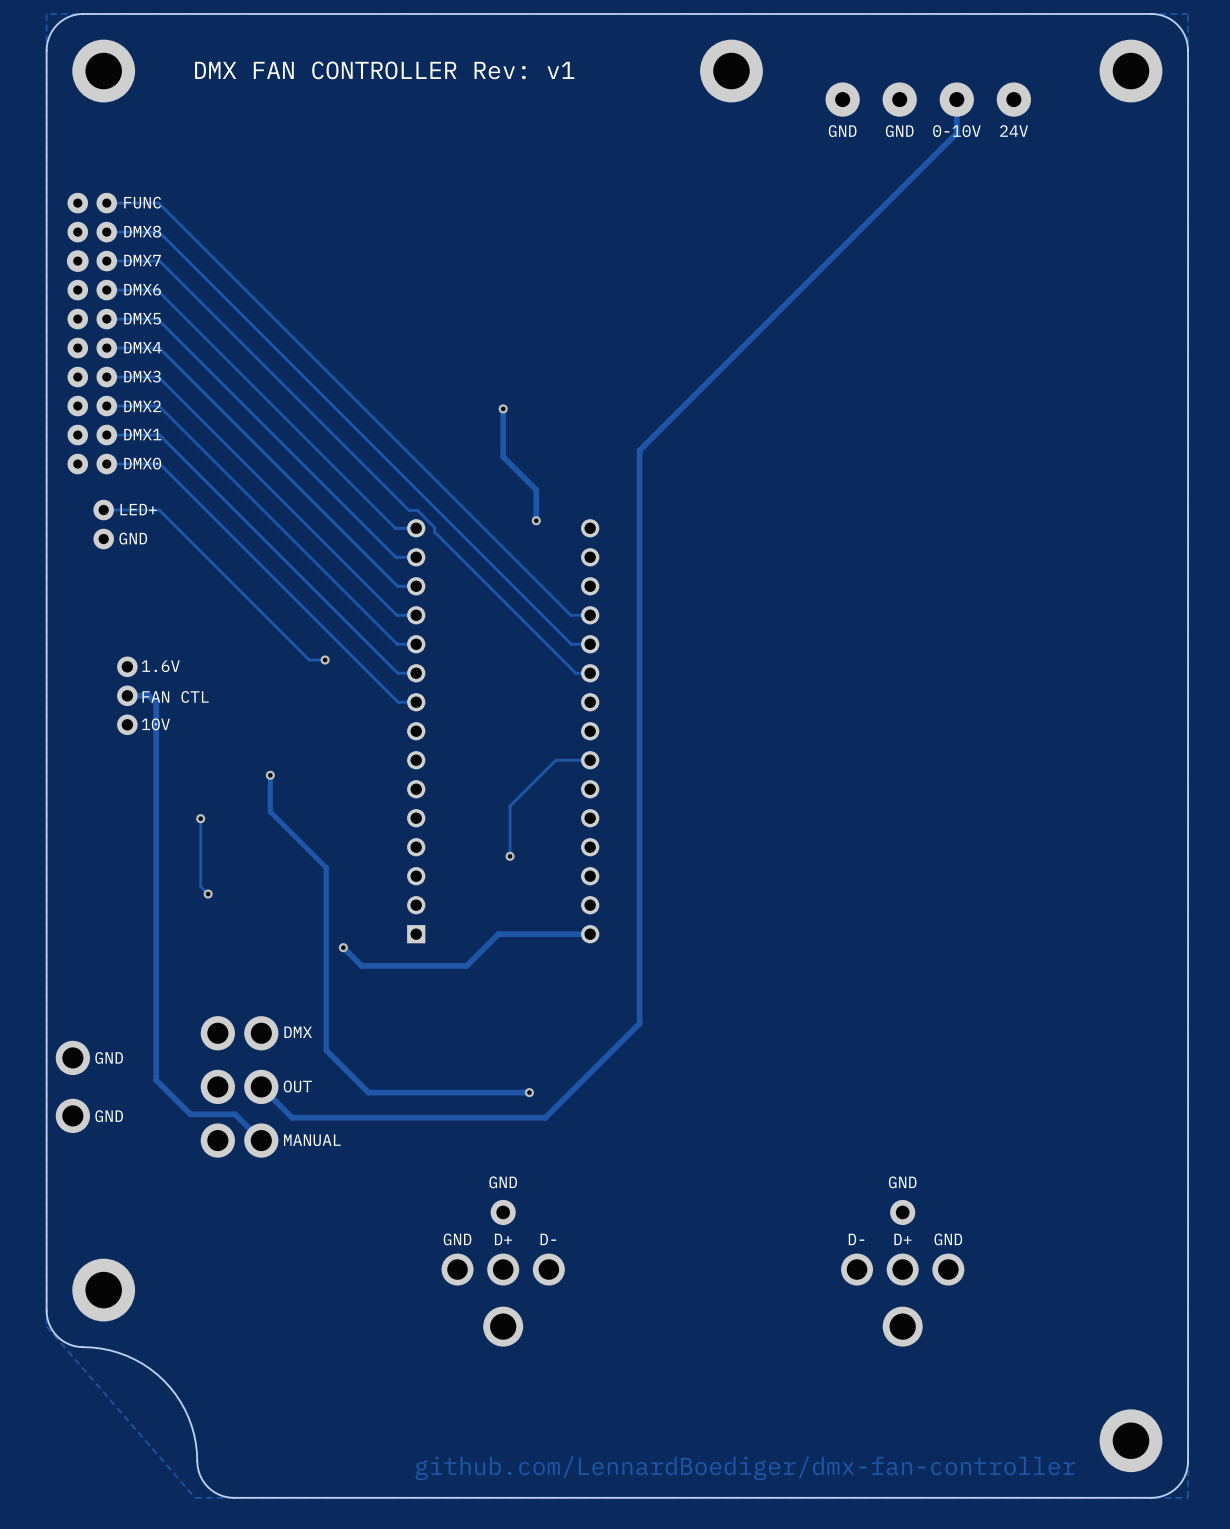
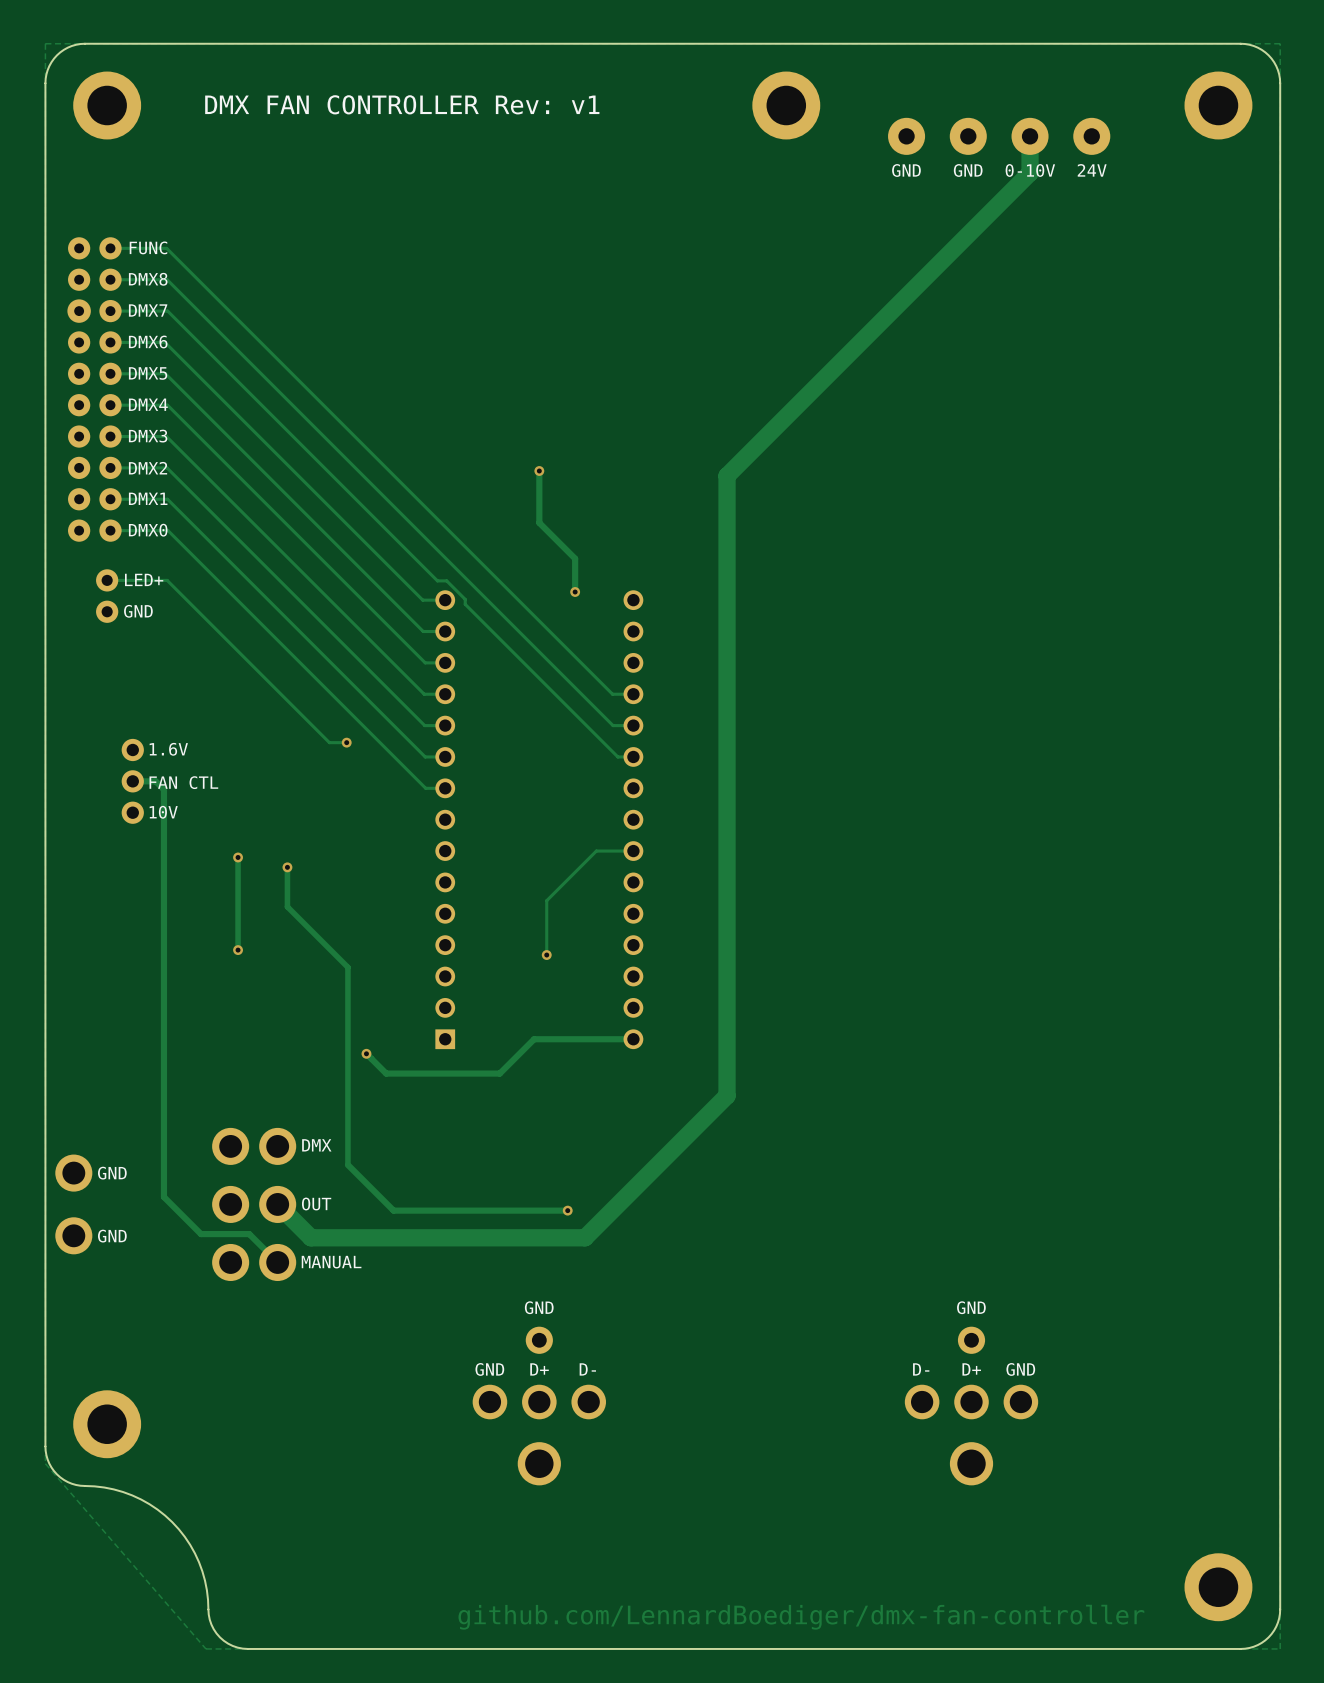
track width: thin (956, 99) (956, 133) (676, 413) -> thick (1030, 136) (1030, 172) (727, 475)
track: (676, 413) (639, 450) (639, 1023) -> (727, 475) (727, 1095) (686, 1135)
track: none -> (238, 857) (238, 950)
via: none -> (238, 857)
track: (200, 818) (200, 886) (208, 894) -> none
via: (200, 818) -> none
via: none -> (238, 950)
via: (208, 894) -> none
track width: thin (639, 1023) (545, 1117) (292, 1117) (261, 1086) -> thick (686, 1135) (585, 1237) (311, 1237) (277, 1204)

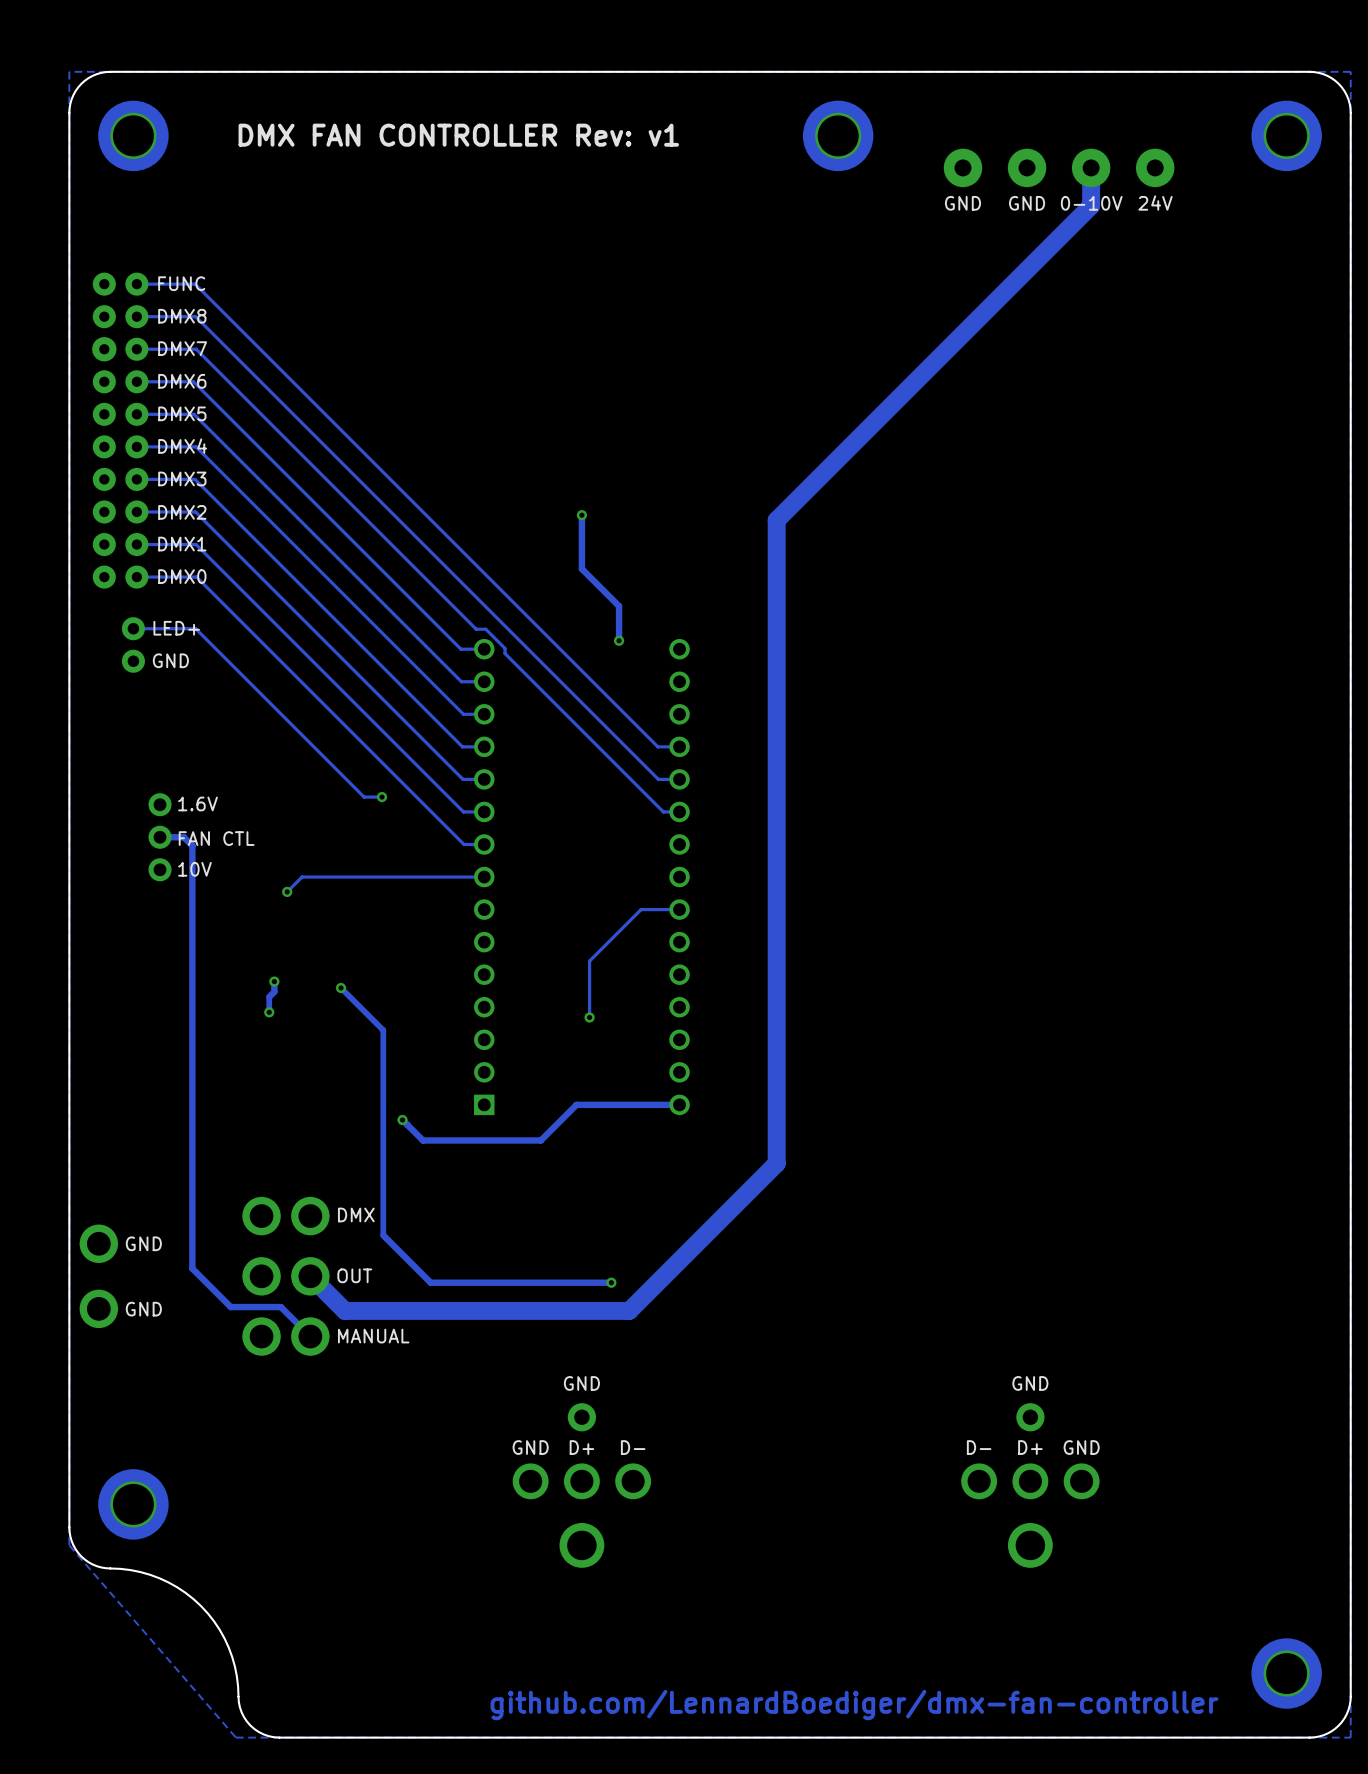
track: none -> (484, 877) (302, 877) (287, 891)
via: none -> (287, 891)
track: (238, 857) (238, 935) -> (274, 981) (274, 991) (269, 996)
via: (238, 857) -> none
track: (287, 867) (287, 906) (307, 926) -> none
via: (287, 867) -> none
via: none -> (274, 981)
via: none -> (341, 988)

